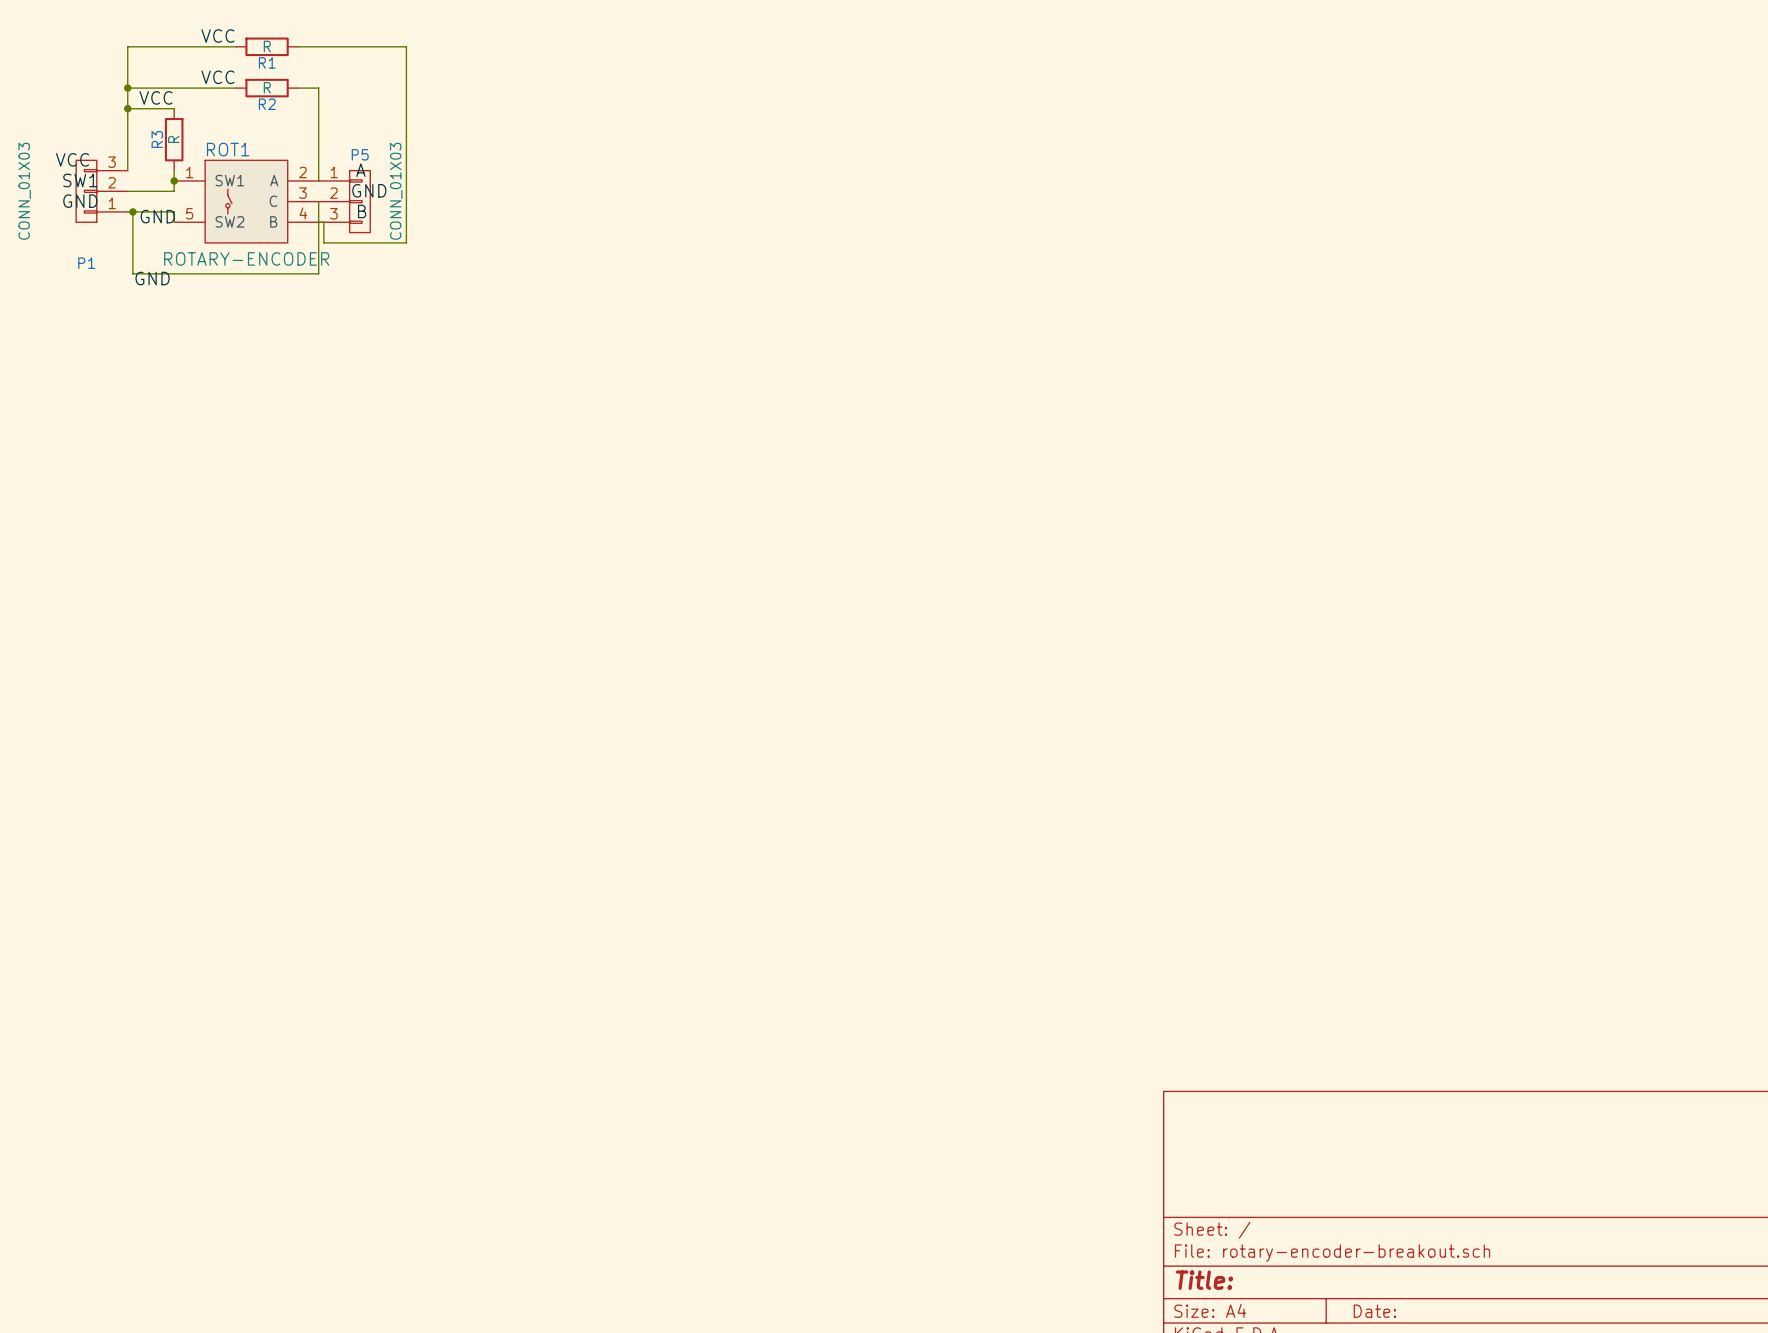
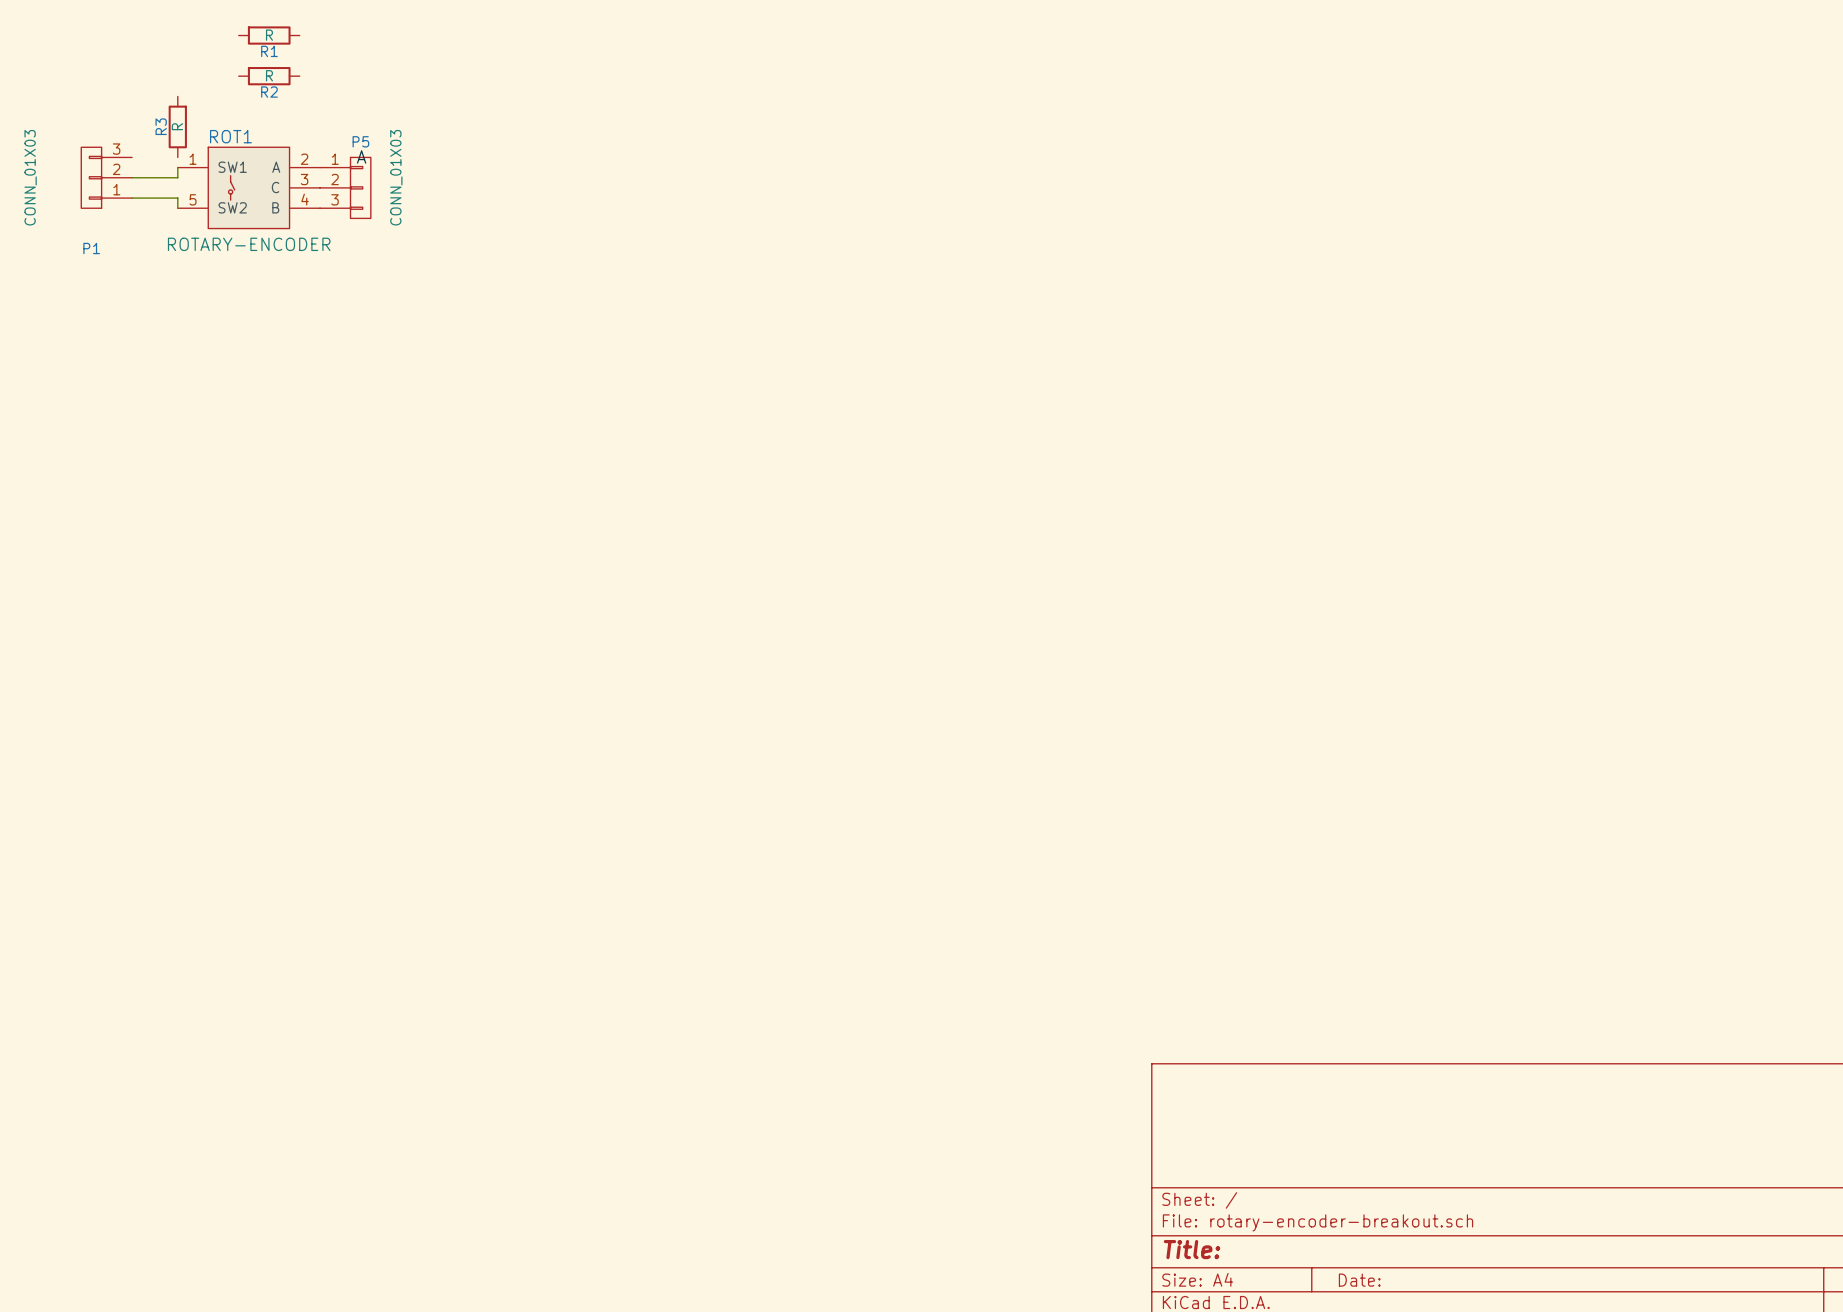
label: VCC (217, 36) -> none
wire: (236, 46) (127, 46) (127, 170) -> none
wire: (298, 46) (406, 46) (406, 242) (323, 242) (323, 222) (318, 222) -> none
label: VCC (217, 77) -> none
wire: (127, 88) (236, 88) -> none
junction: (127, 88) -> none
wire: (298, 88) (318, 88) (318, 180) -> none
label: VCC (155, 97) -> none
wire: (127, 108) (174, 108) -> none
junction: (127, 108) -> none
label: VCC (72, 159) -> none
wire: (174, 170) (174, 180) -> none
label: SW1 (80, 180) -> none
junction: (174, 180) -> none
label: GND (369, 190) -> none
label: GND (80, 201) -> none
wire: (318, 201) (318, 273) (132, 273) (132, 211) -> none
junction: (132, 211) -> none
label: B (362, 211) -> none
label: GND (157, 216) -> none
label: GND (152, 278) -> none

